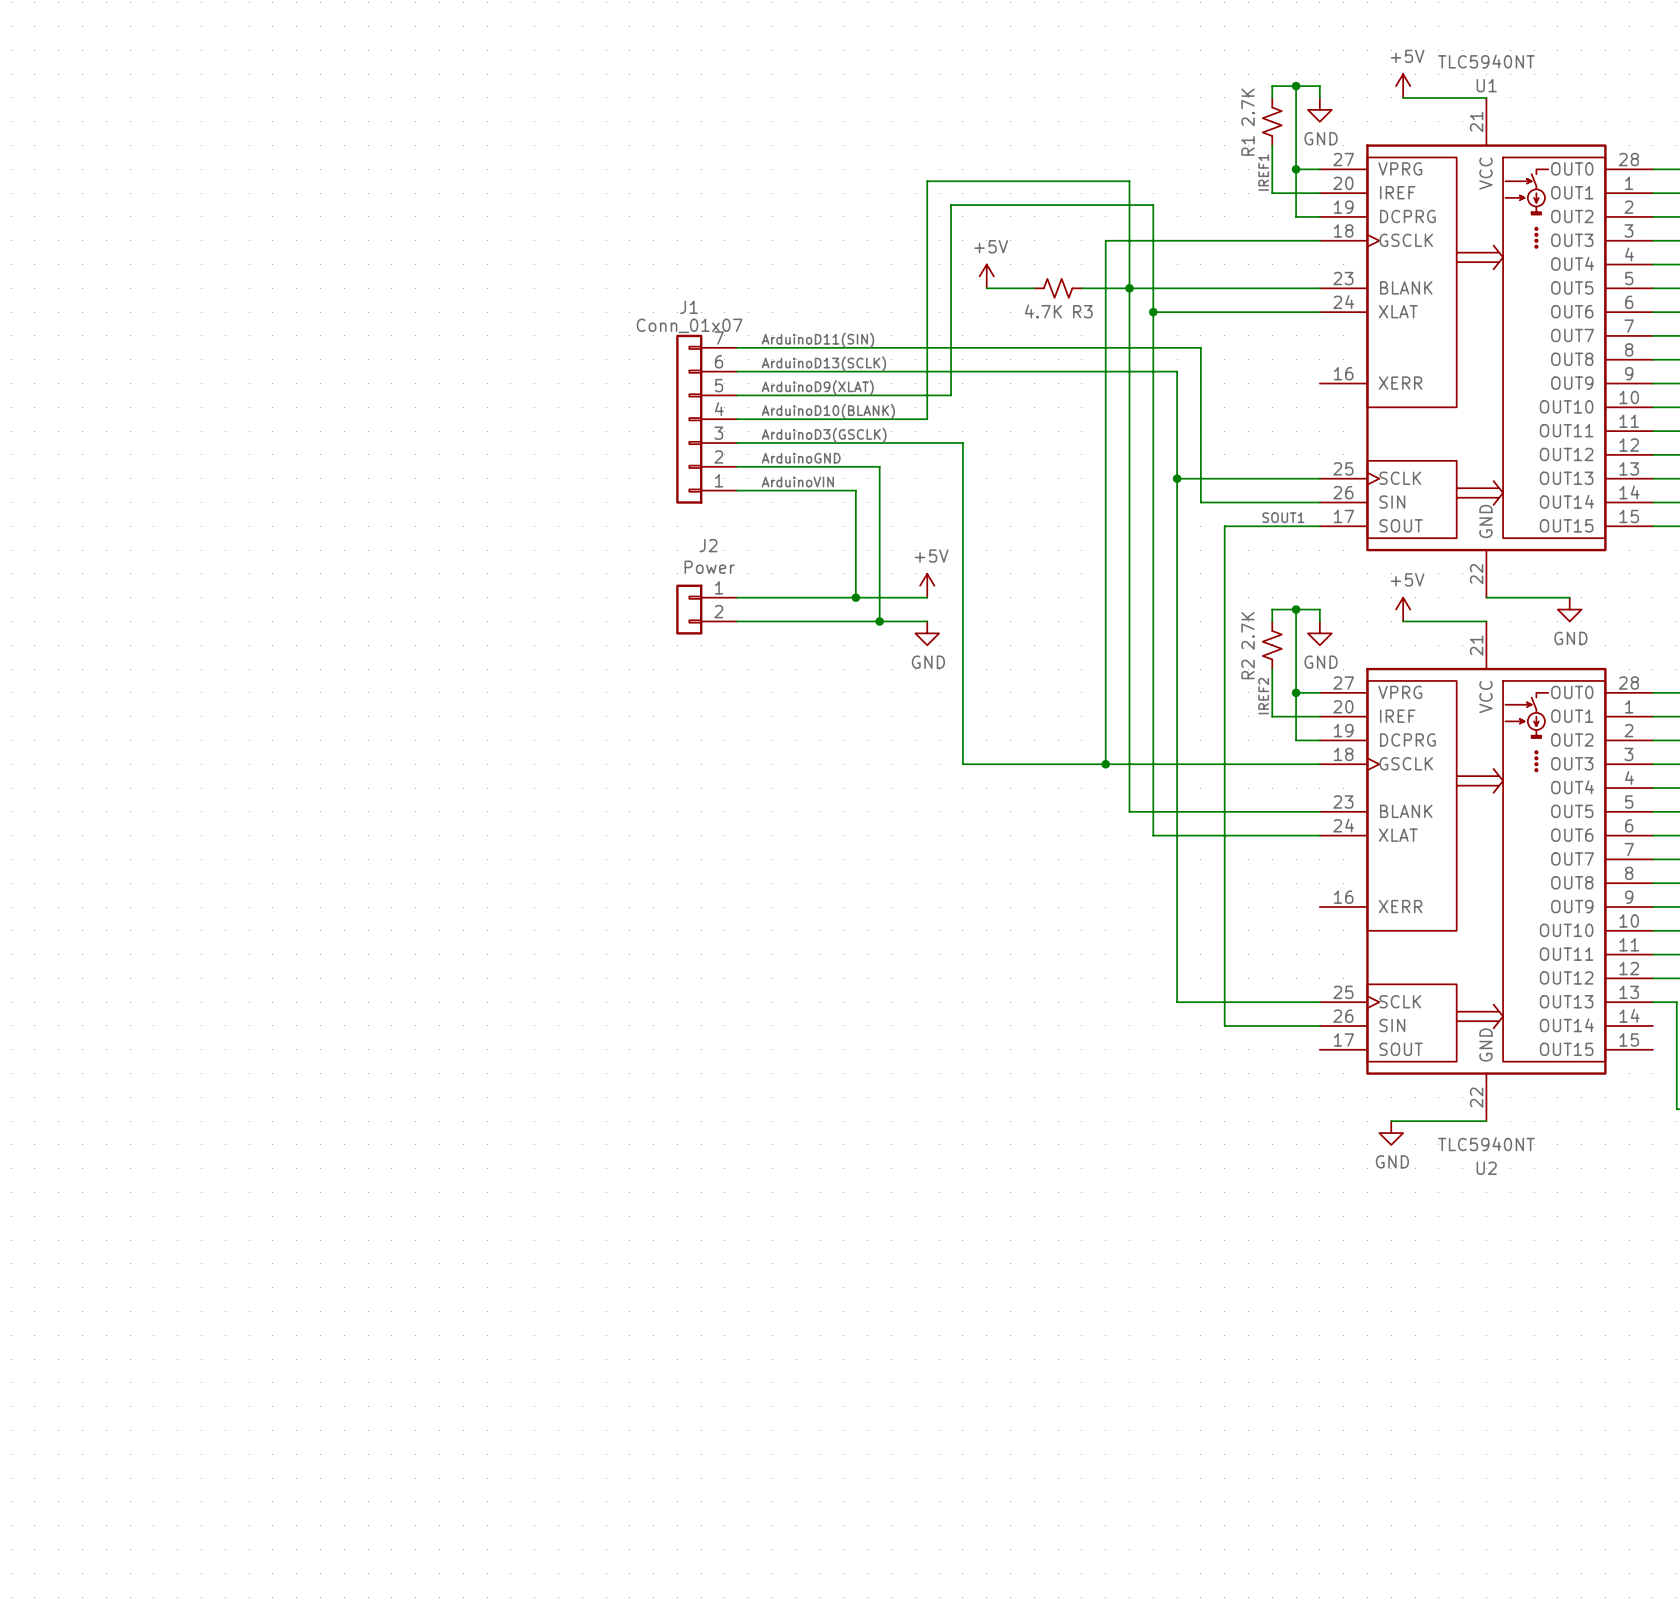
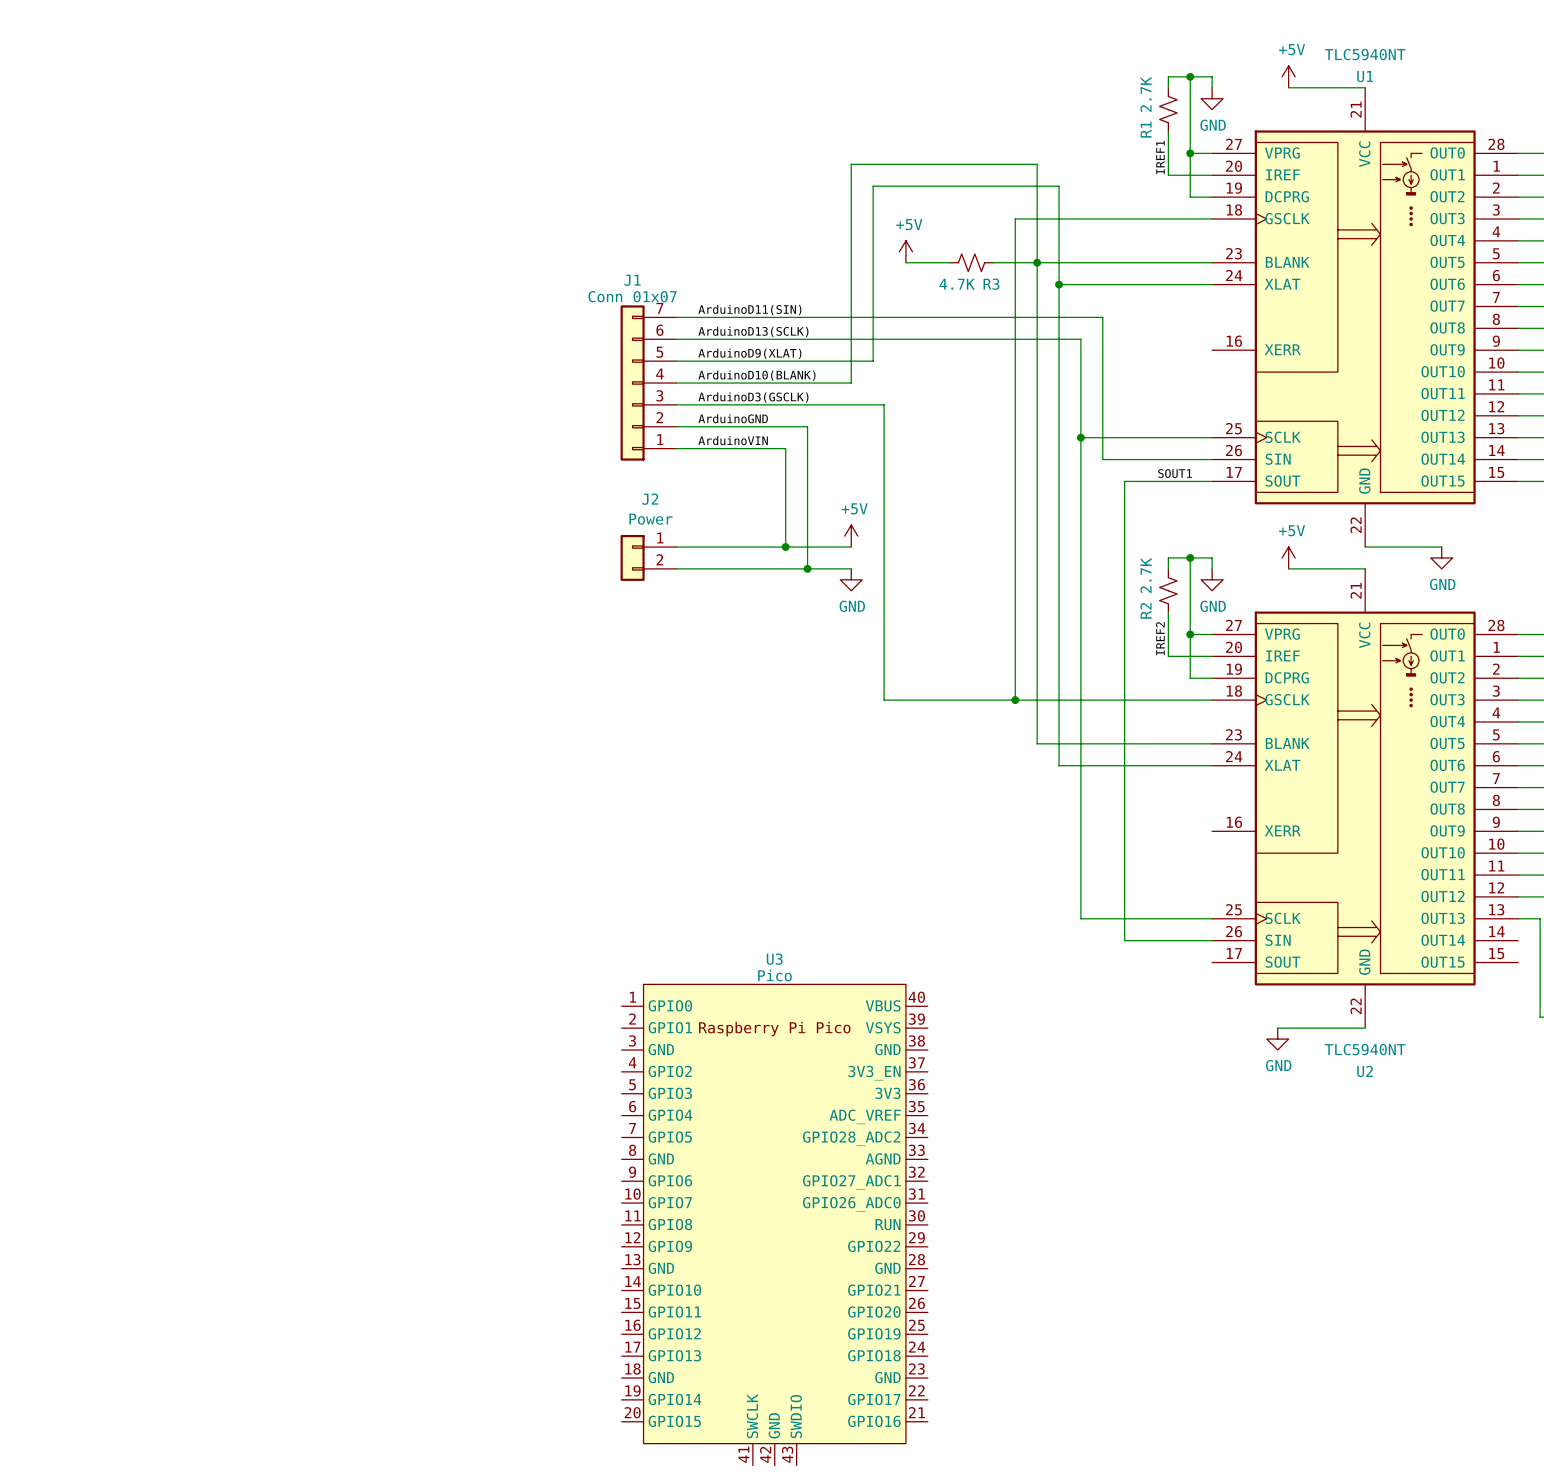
U3: none -> Pico (774, 1224)

